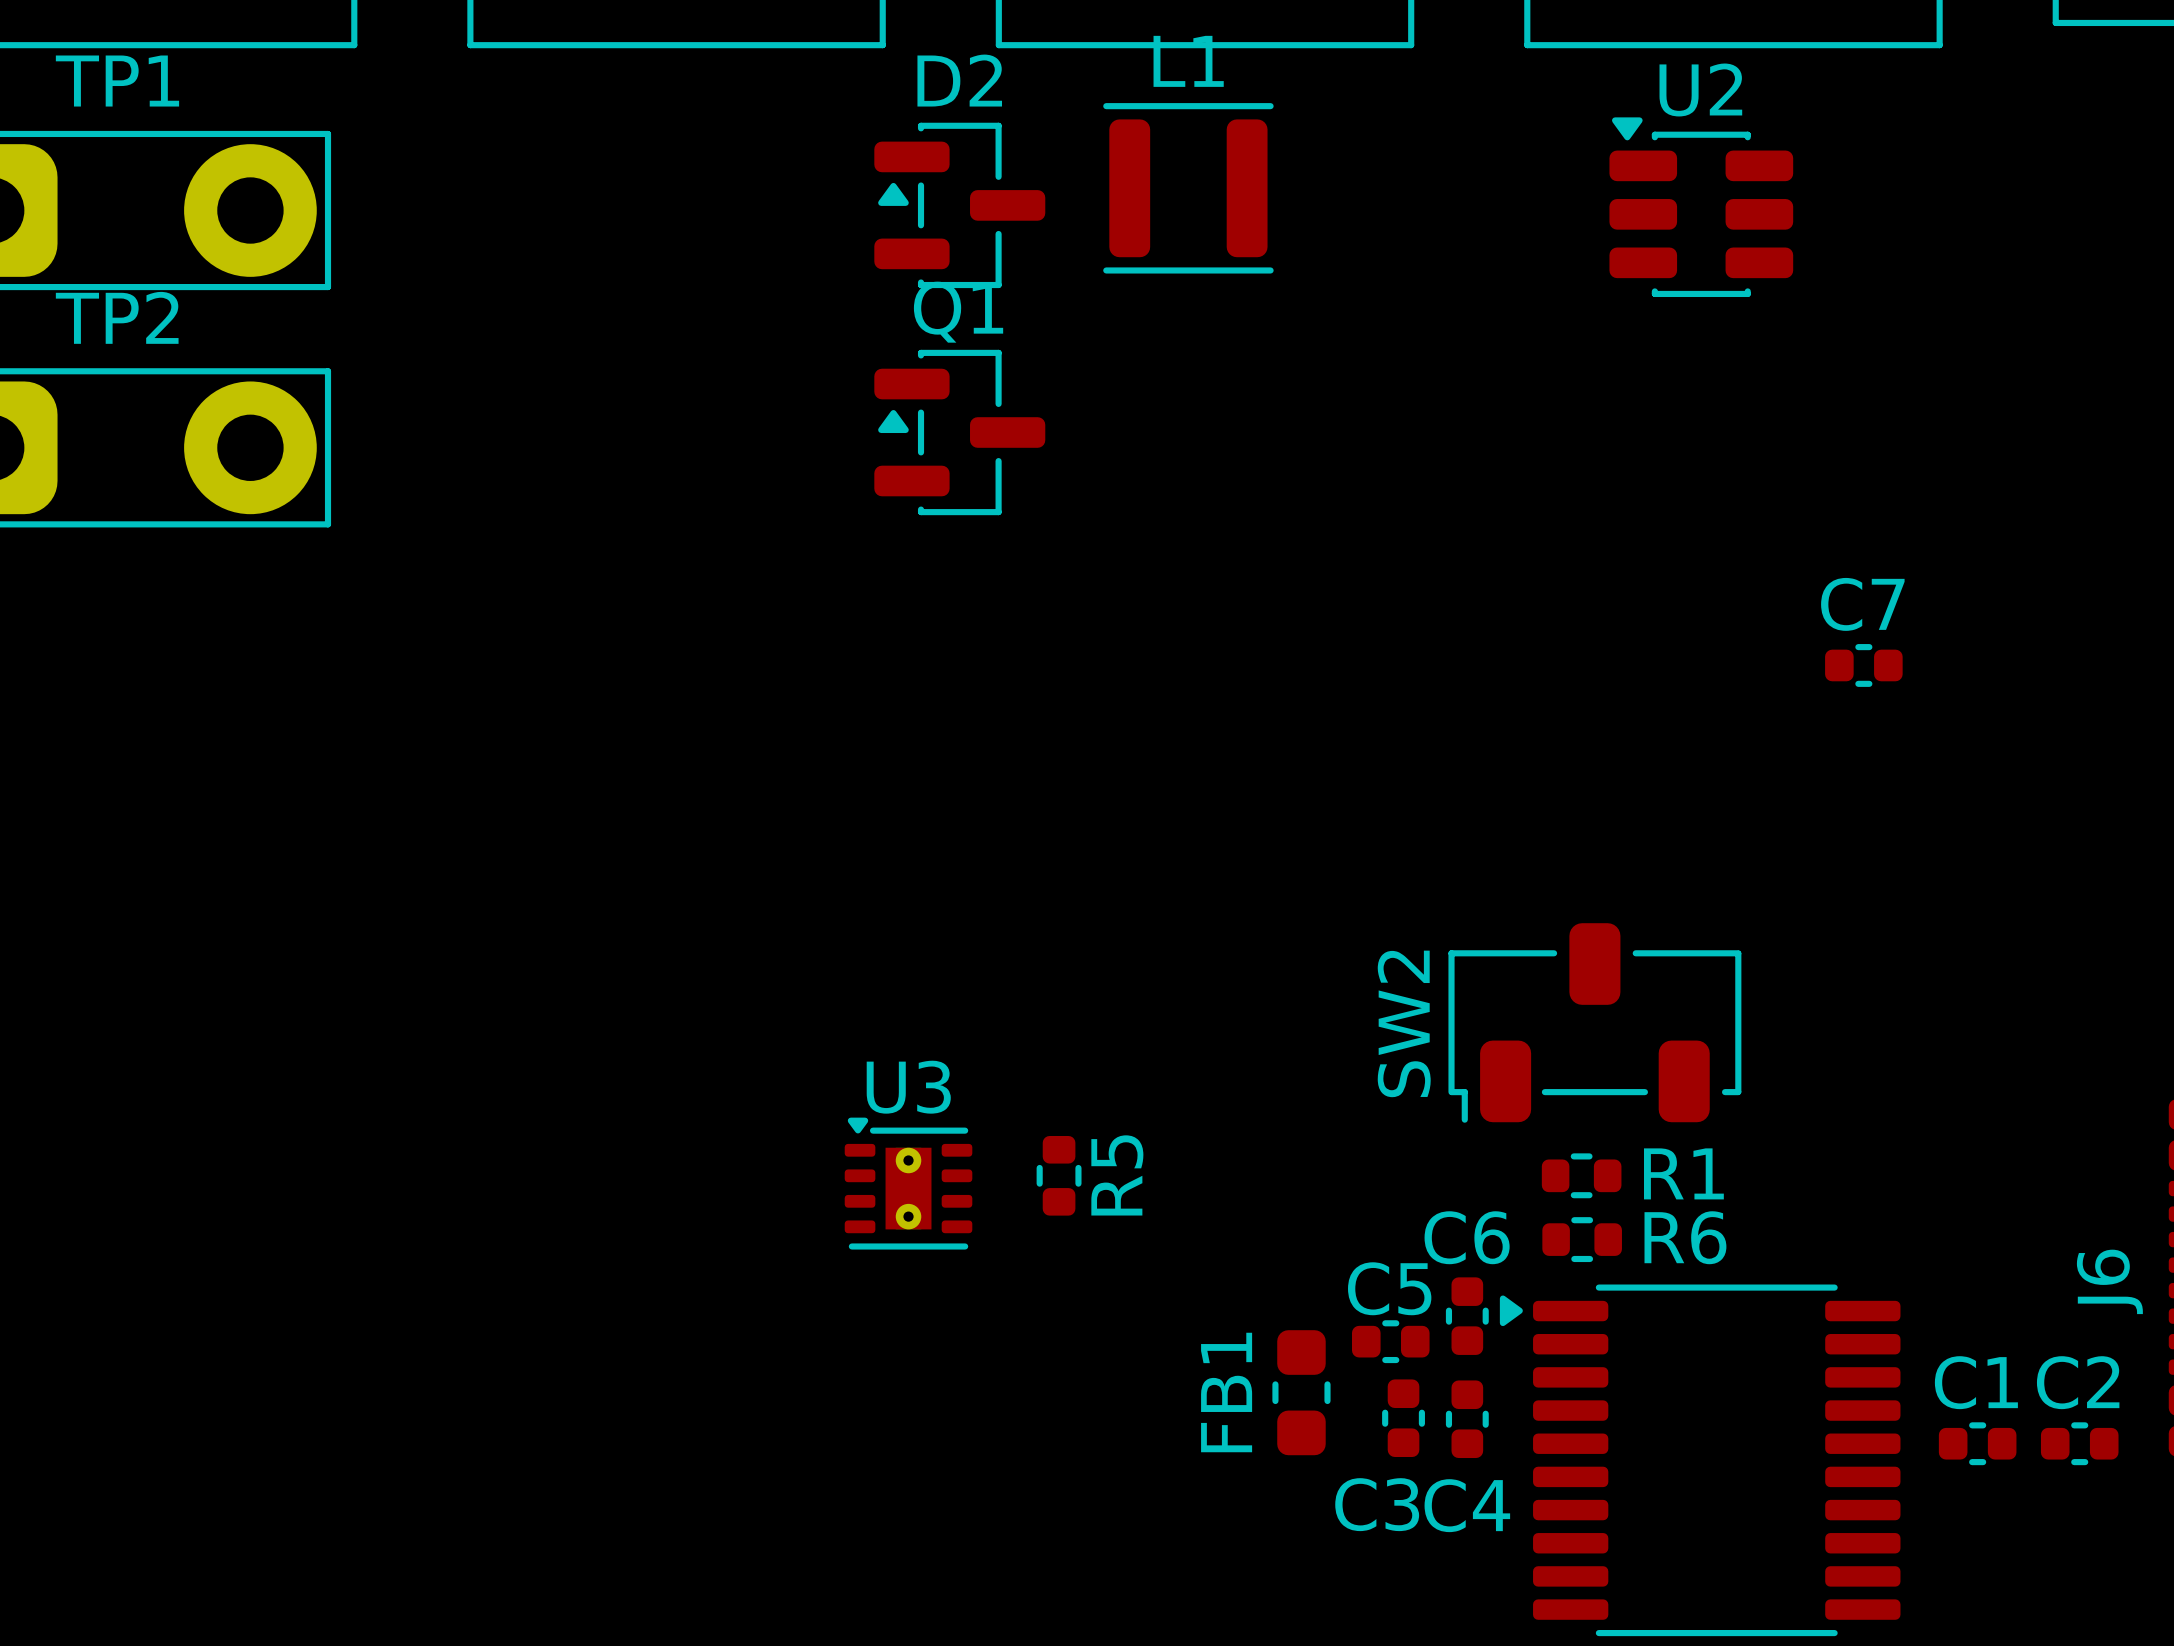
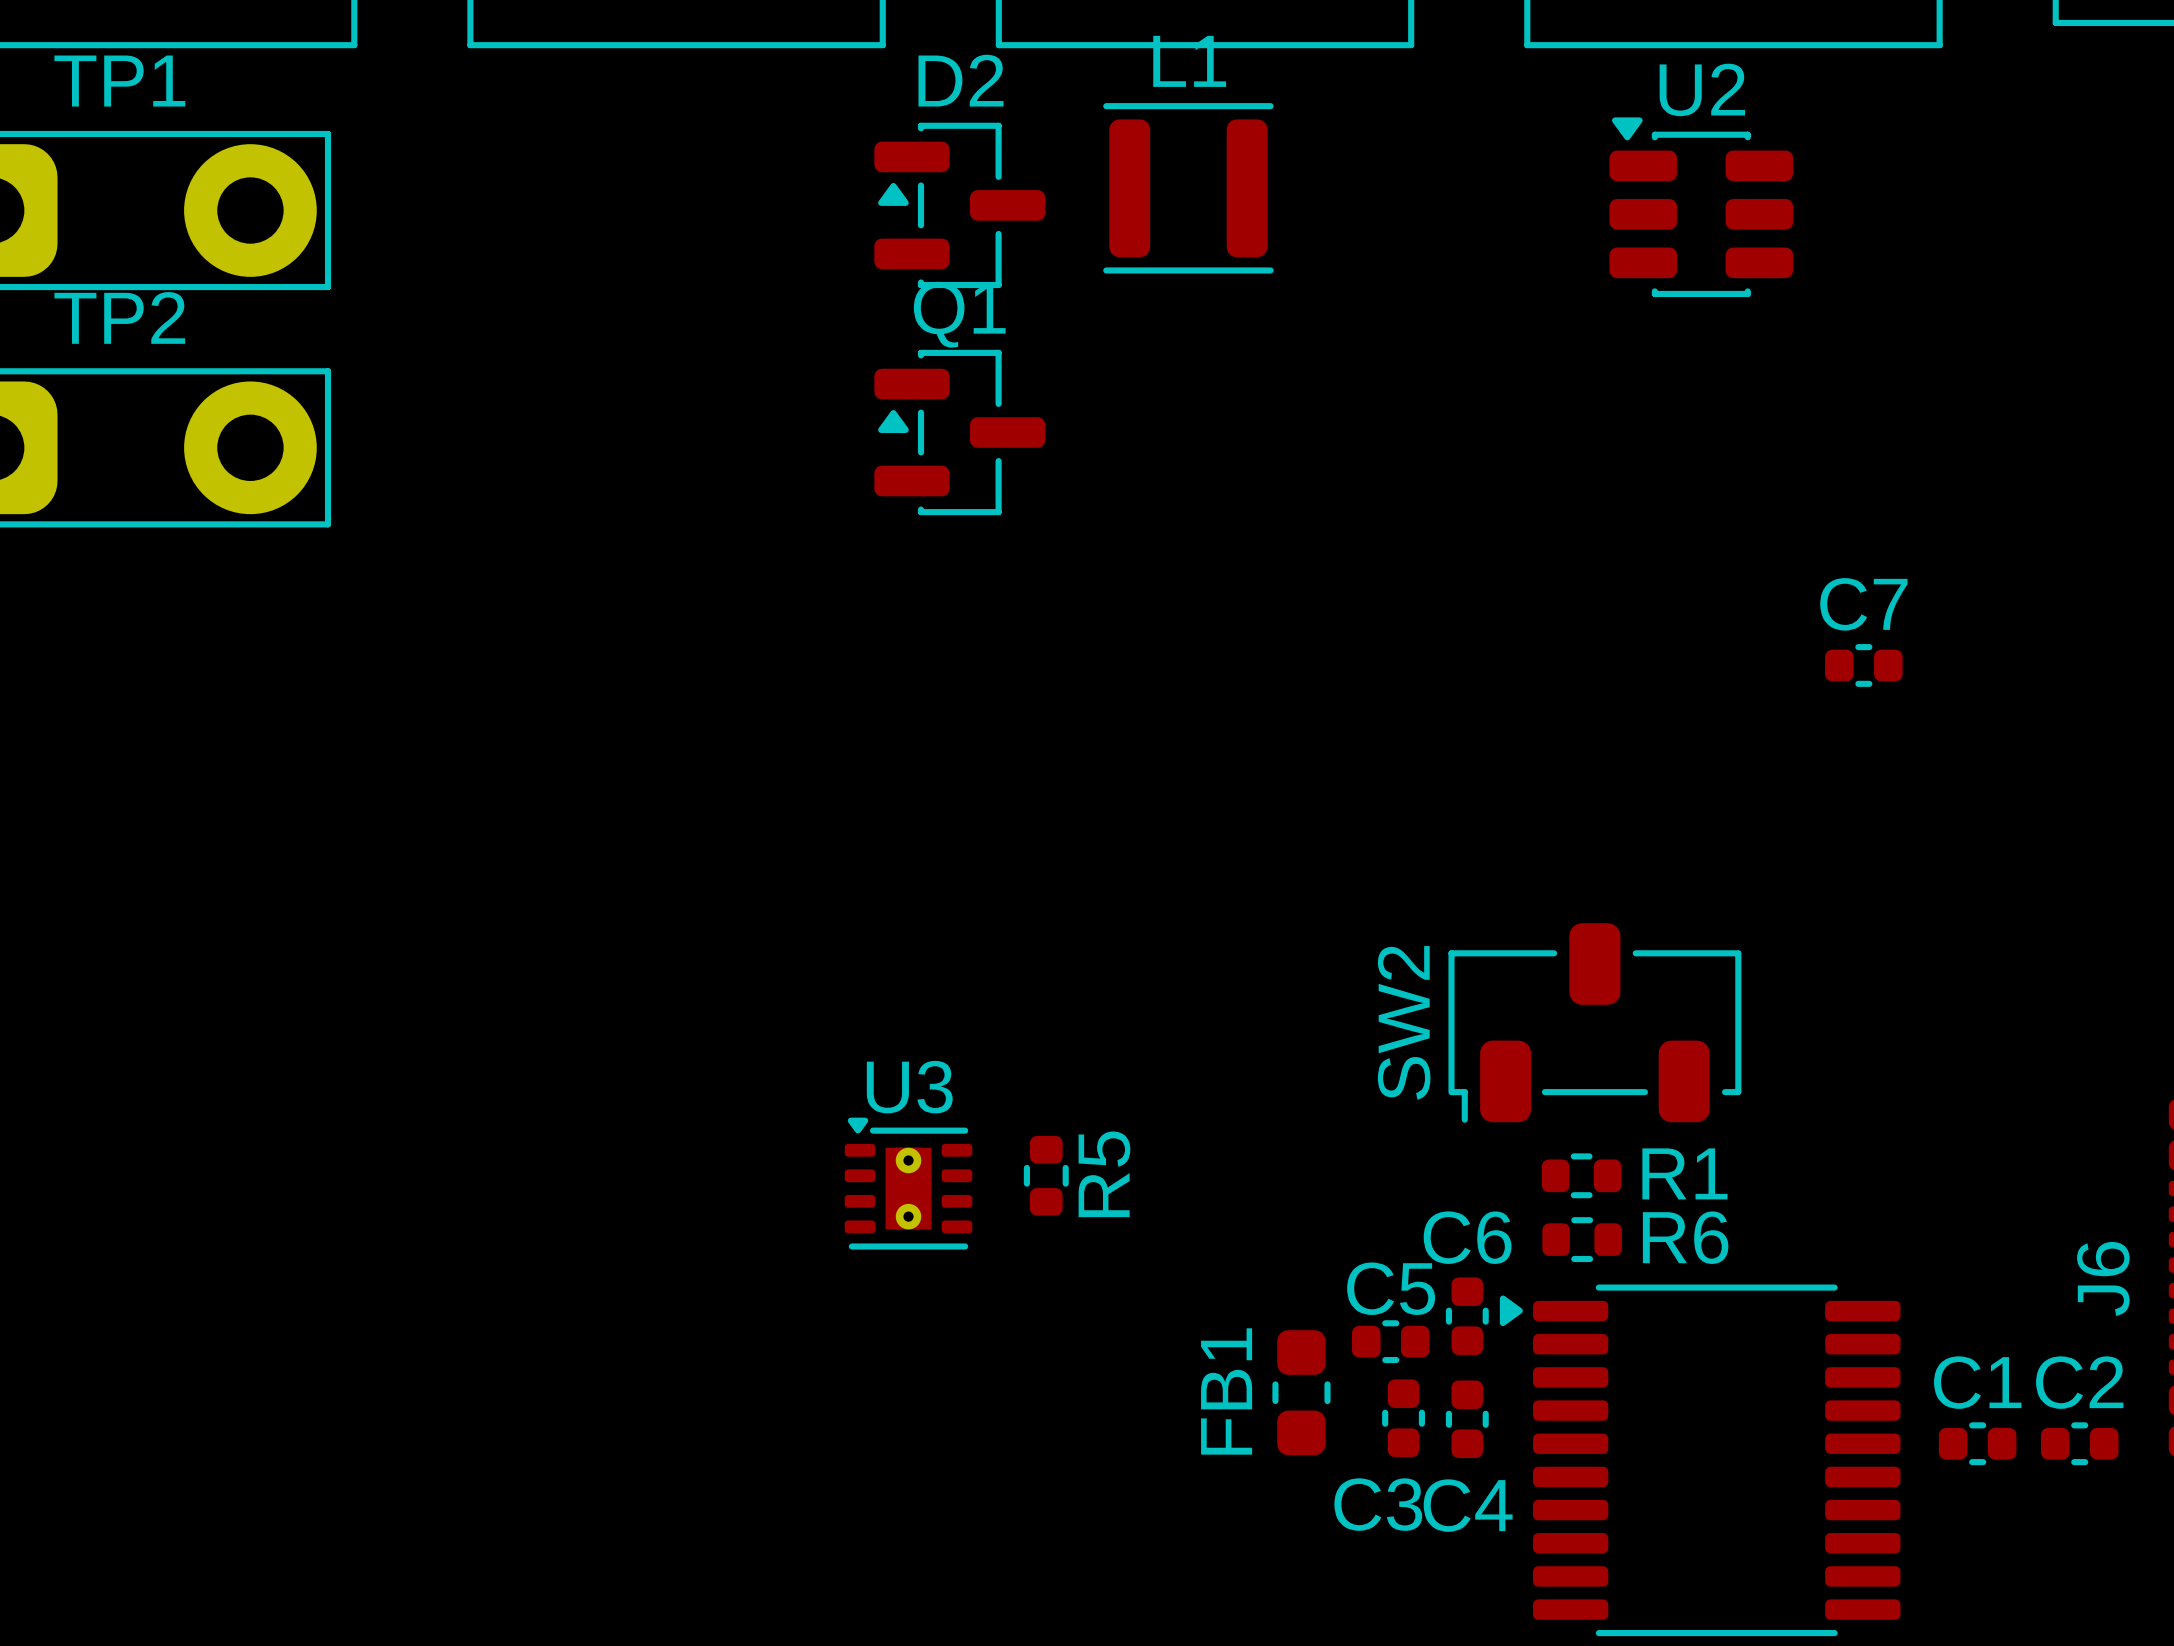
R5 position: (1059, 1175) -> (1046, 1175)

